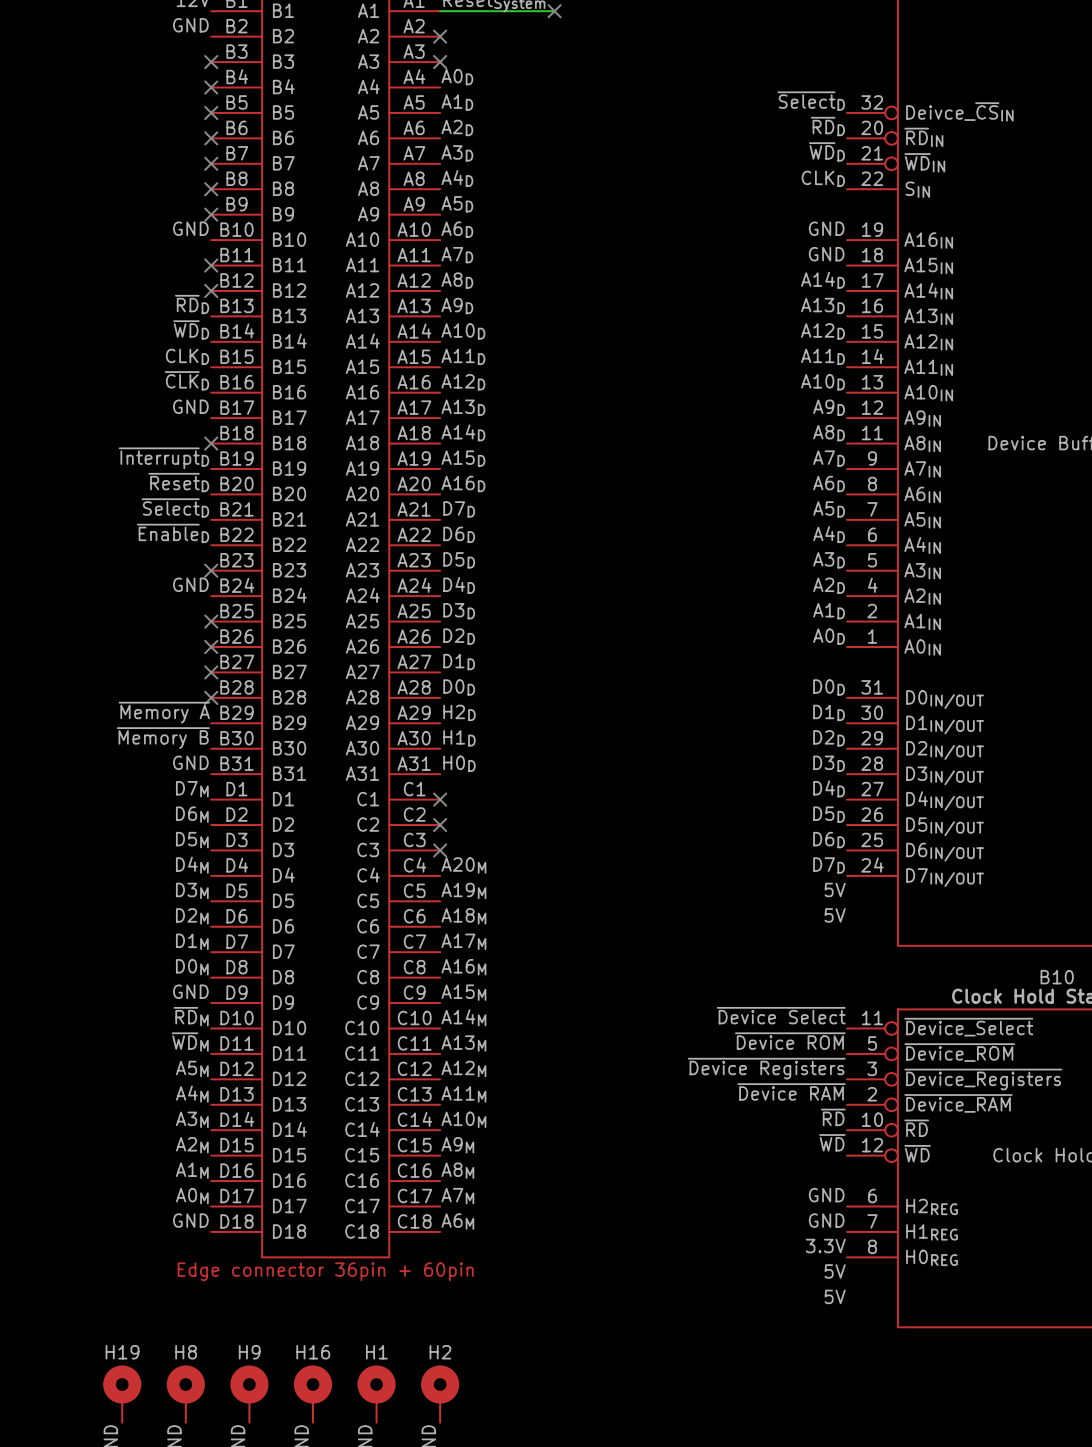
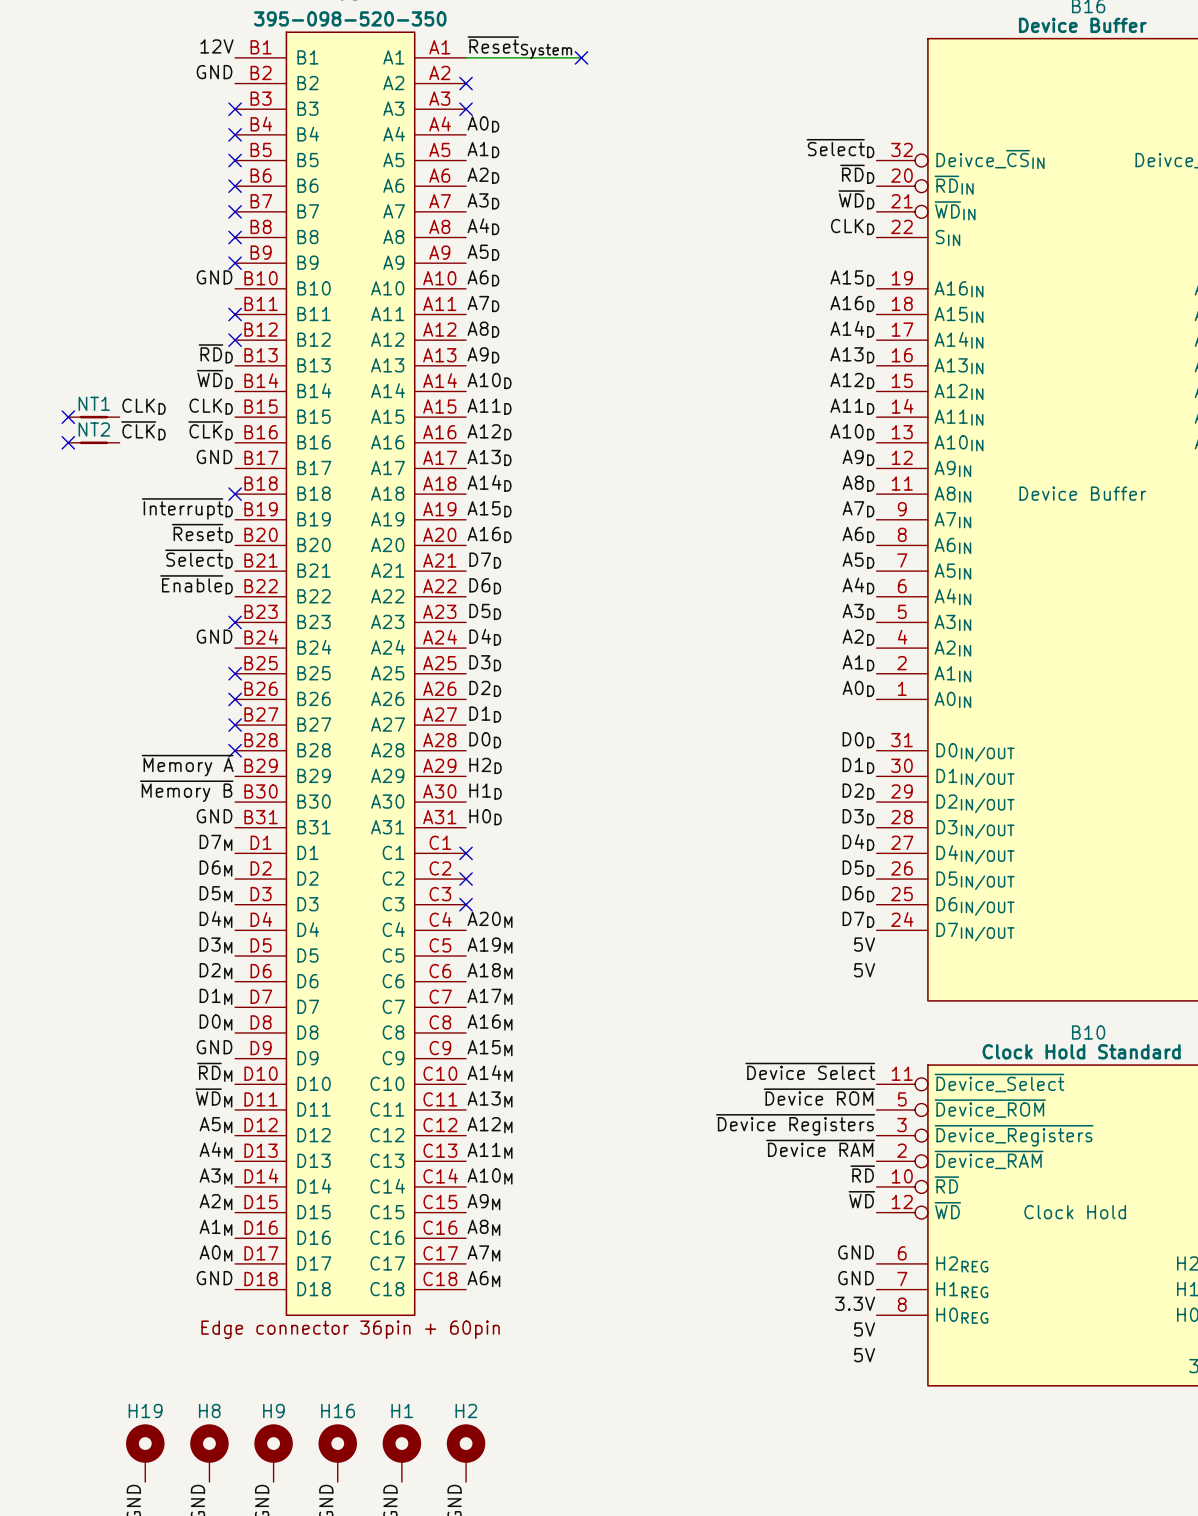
label: GND (826, 228) -> A15D (852, 278)
label: GND (826, 254) -> A16D (852, 304)
label: none -> CLKD (144, 406)
no-connect mark: none -> (68, 417)
NT1: none -> (93, 417)
label: none -> ~{CLK}D (143, 430)
no-connect mark: none -> (68, 442)
NT2: none -> (93, 442)

